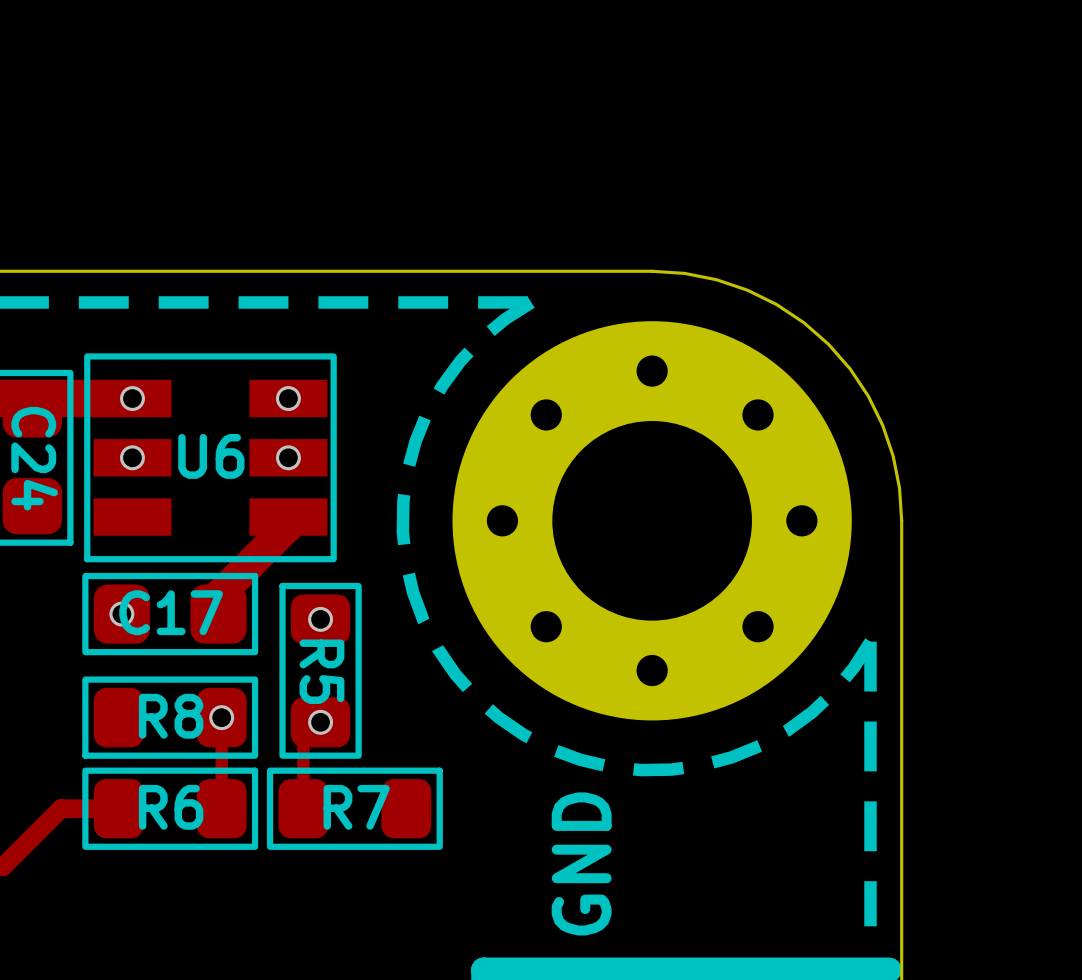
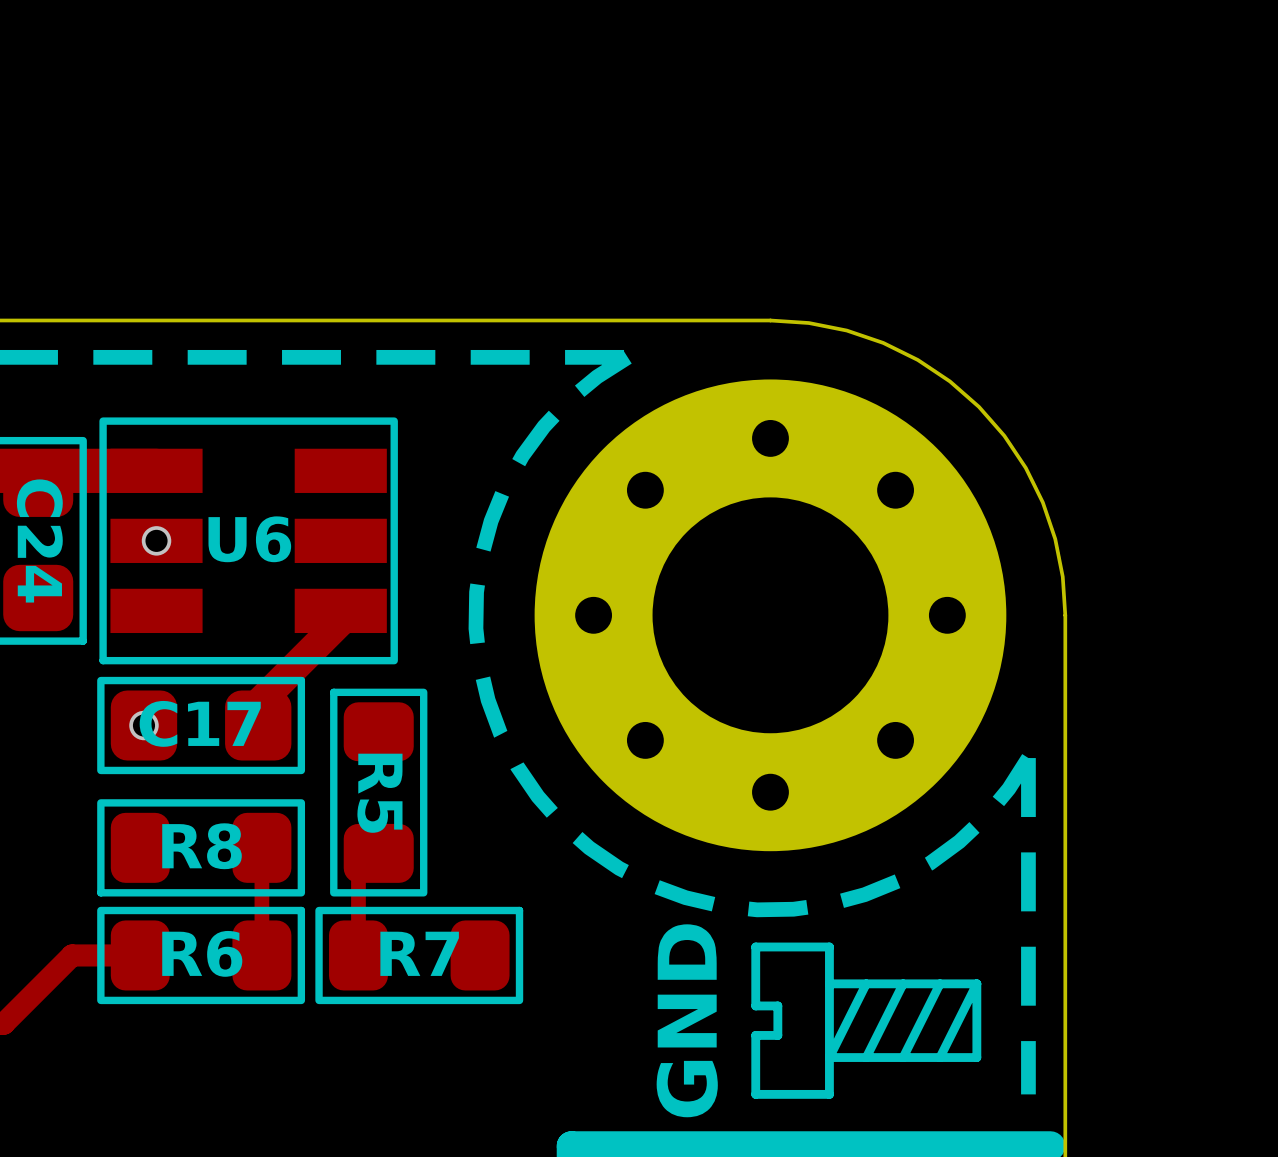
via: (132, 398) -> none
via: (288, 398) -> none
via: (288, 457) -> none
top track width: thick (288, 517) (288, 525) (218, 595) -> thin (340, 610) (340, 621) (258, 703)
via: (320, 619) -> none
via: (221, 717) -> none
via: (320, 722) -> none
drawing: none -> [751, 942, 982, 1099]

